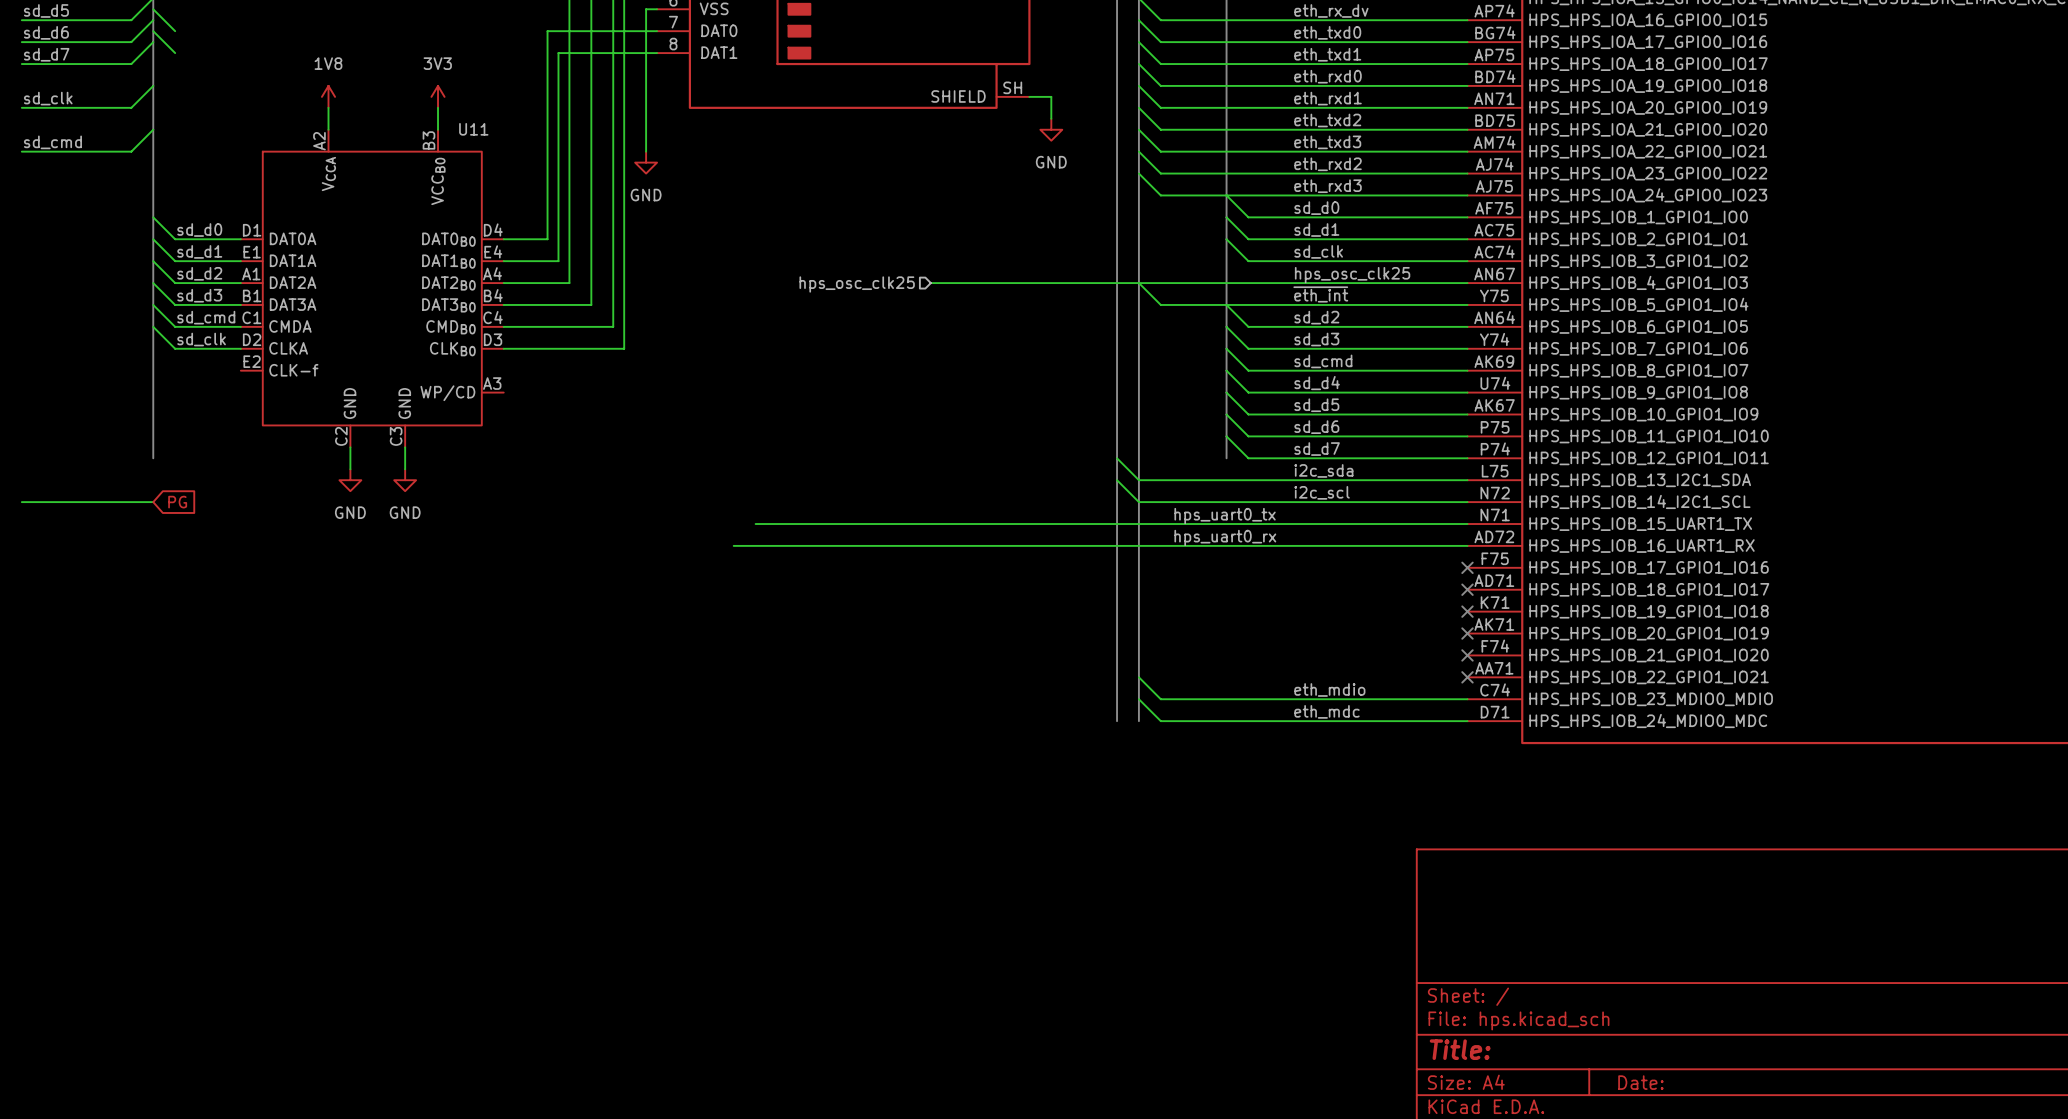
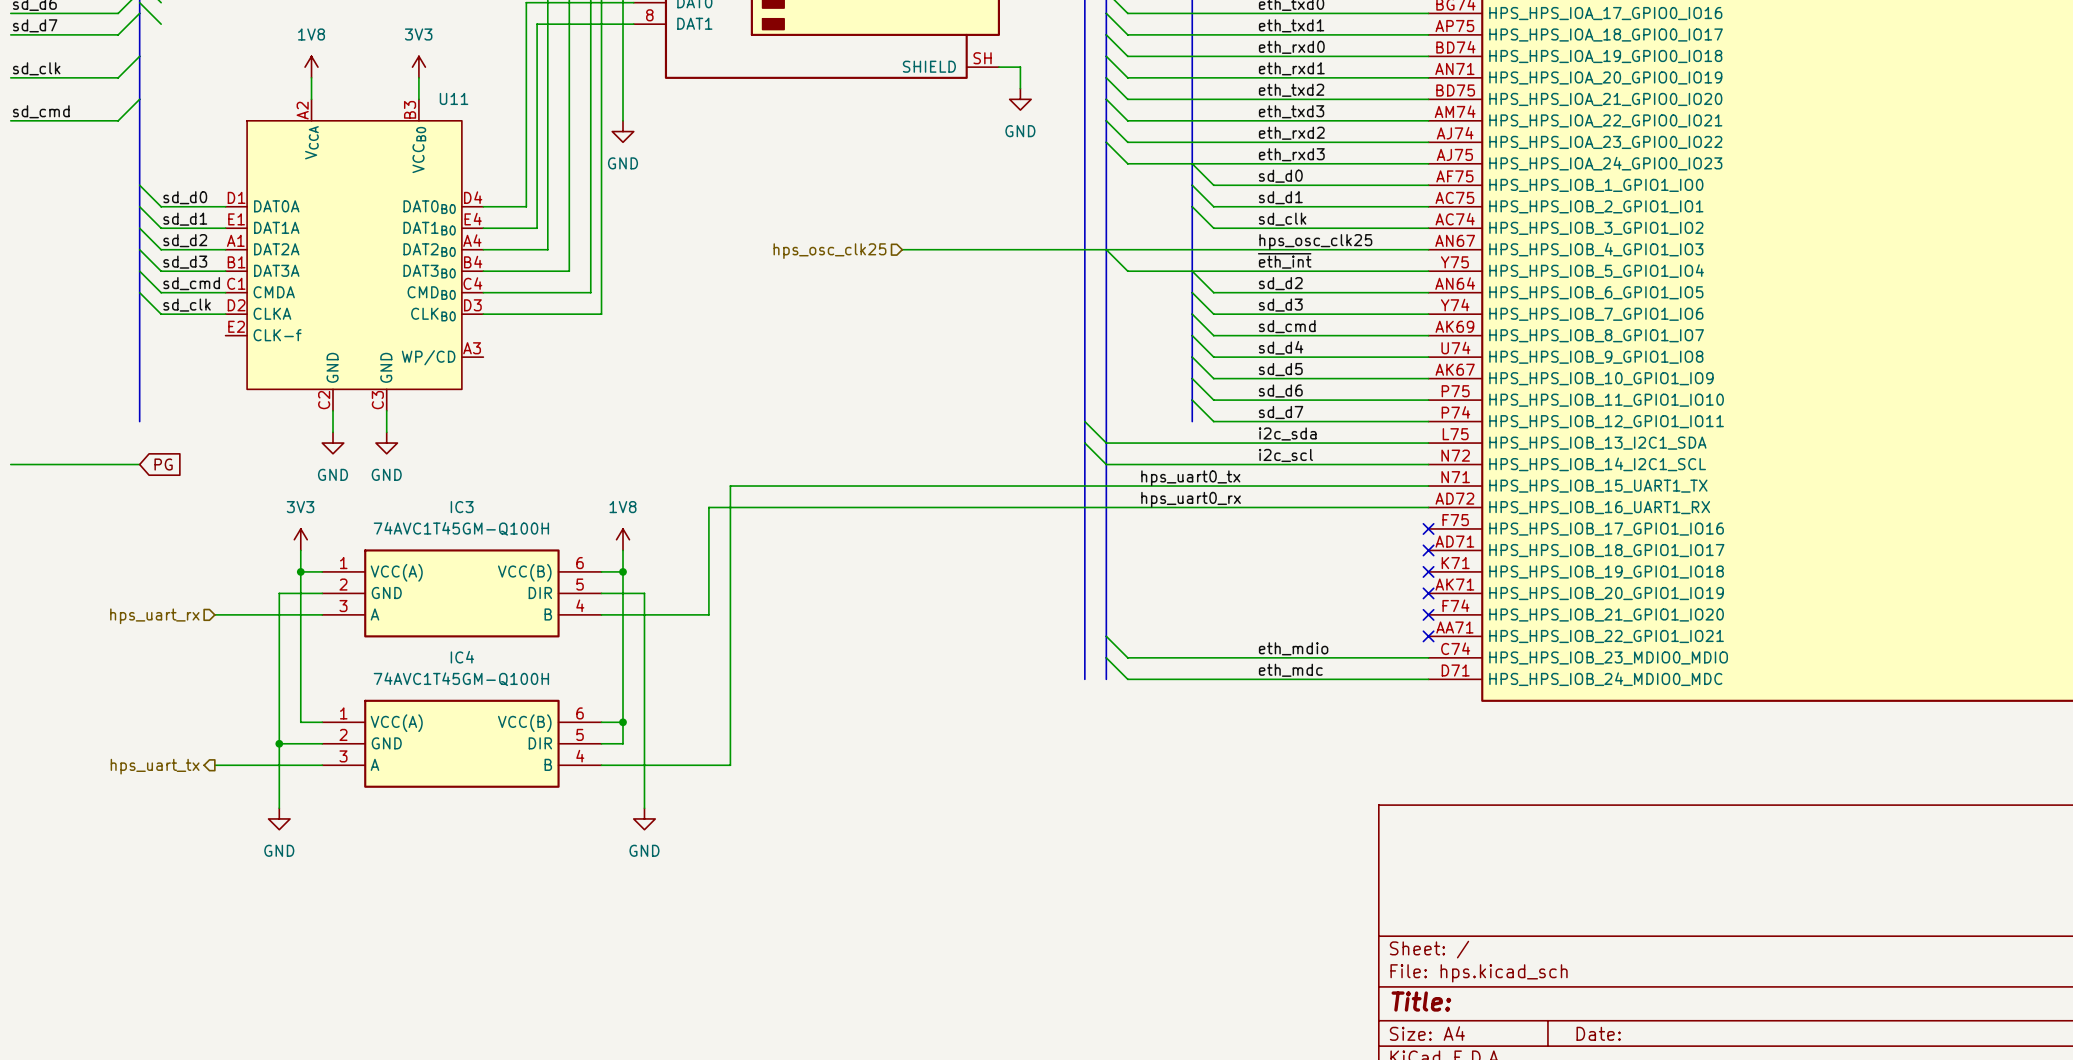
wire: none -> (730, 486) (730, 765) (601, 765)
wire: none -> (708, 507) (708, 614) (601, 614)
power symbol: none -> 3V3 (300, 539)
power symbol: none -> 1V8 (623, 539)
wire: none -> (300, 550) (300, 722) (322, 722)
wire: none -> (623, 550) (623, 743) (601, 743)
wire: none -> (300, 571) (322, 571)
junction: none -> (300, 571)
wire: none -> (601, 571) (623, 571)
junction: none -> (623, 571)
wire: none -> (322, 593) (279, 593) (279, 808)
IC3: none -> 74AVC1T45GM-Q100H (461, 593)
wire: none -> (601, 593) (644, 593) (644, 808)
wire: none -> (214, 614) (322, 614)
hierarchical label: none -> hps_uart_rx (154, 616)
wire: none -> (601, 722) (623, 722)
junction: none -> (623, 722)
wire: none -> (279, 743) (322, 743)
junction: none -> (279, 743)
IC4: none -> 74AVC1T45GM-Q100H (461, 743)
wire: none -> (214, 765) (322, 765)
hierarchical label: none -> hps_uart_tx (155, 766)
power symbol: none -> GND (279, 818)
power symbol: none -> GND (644, 818)

